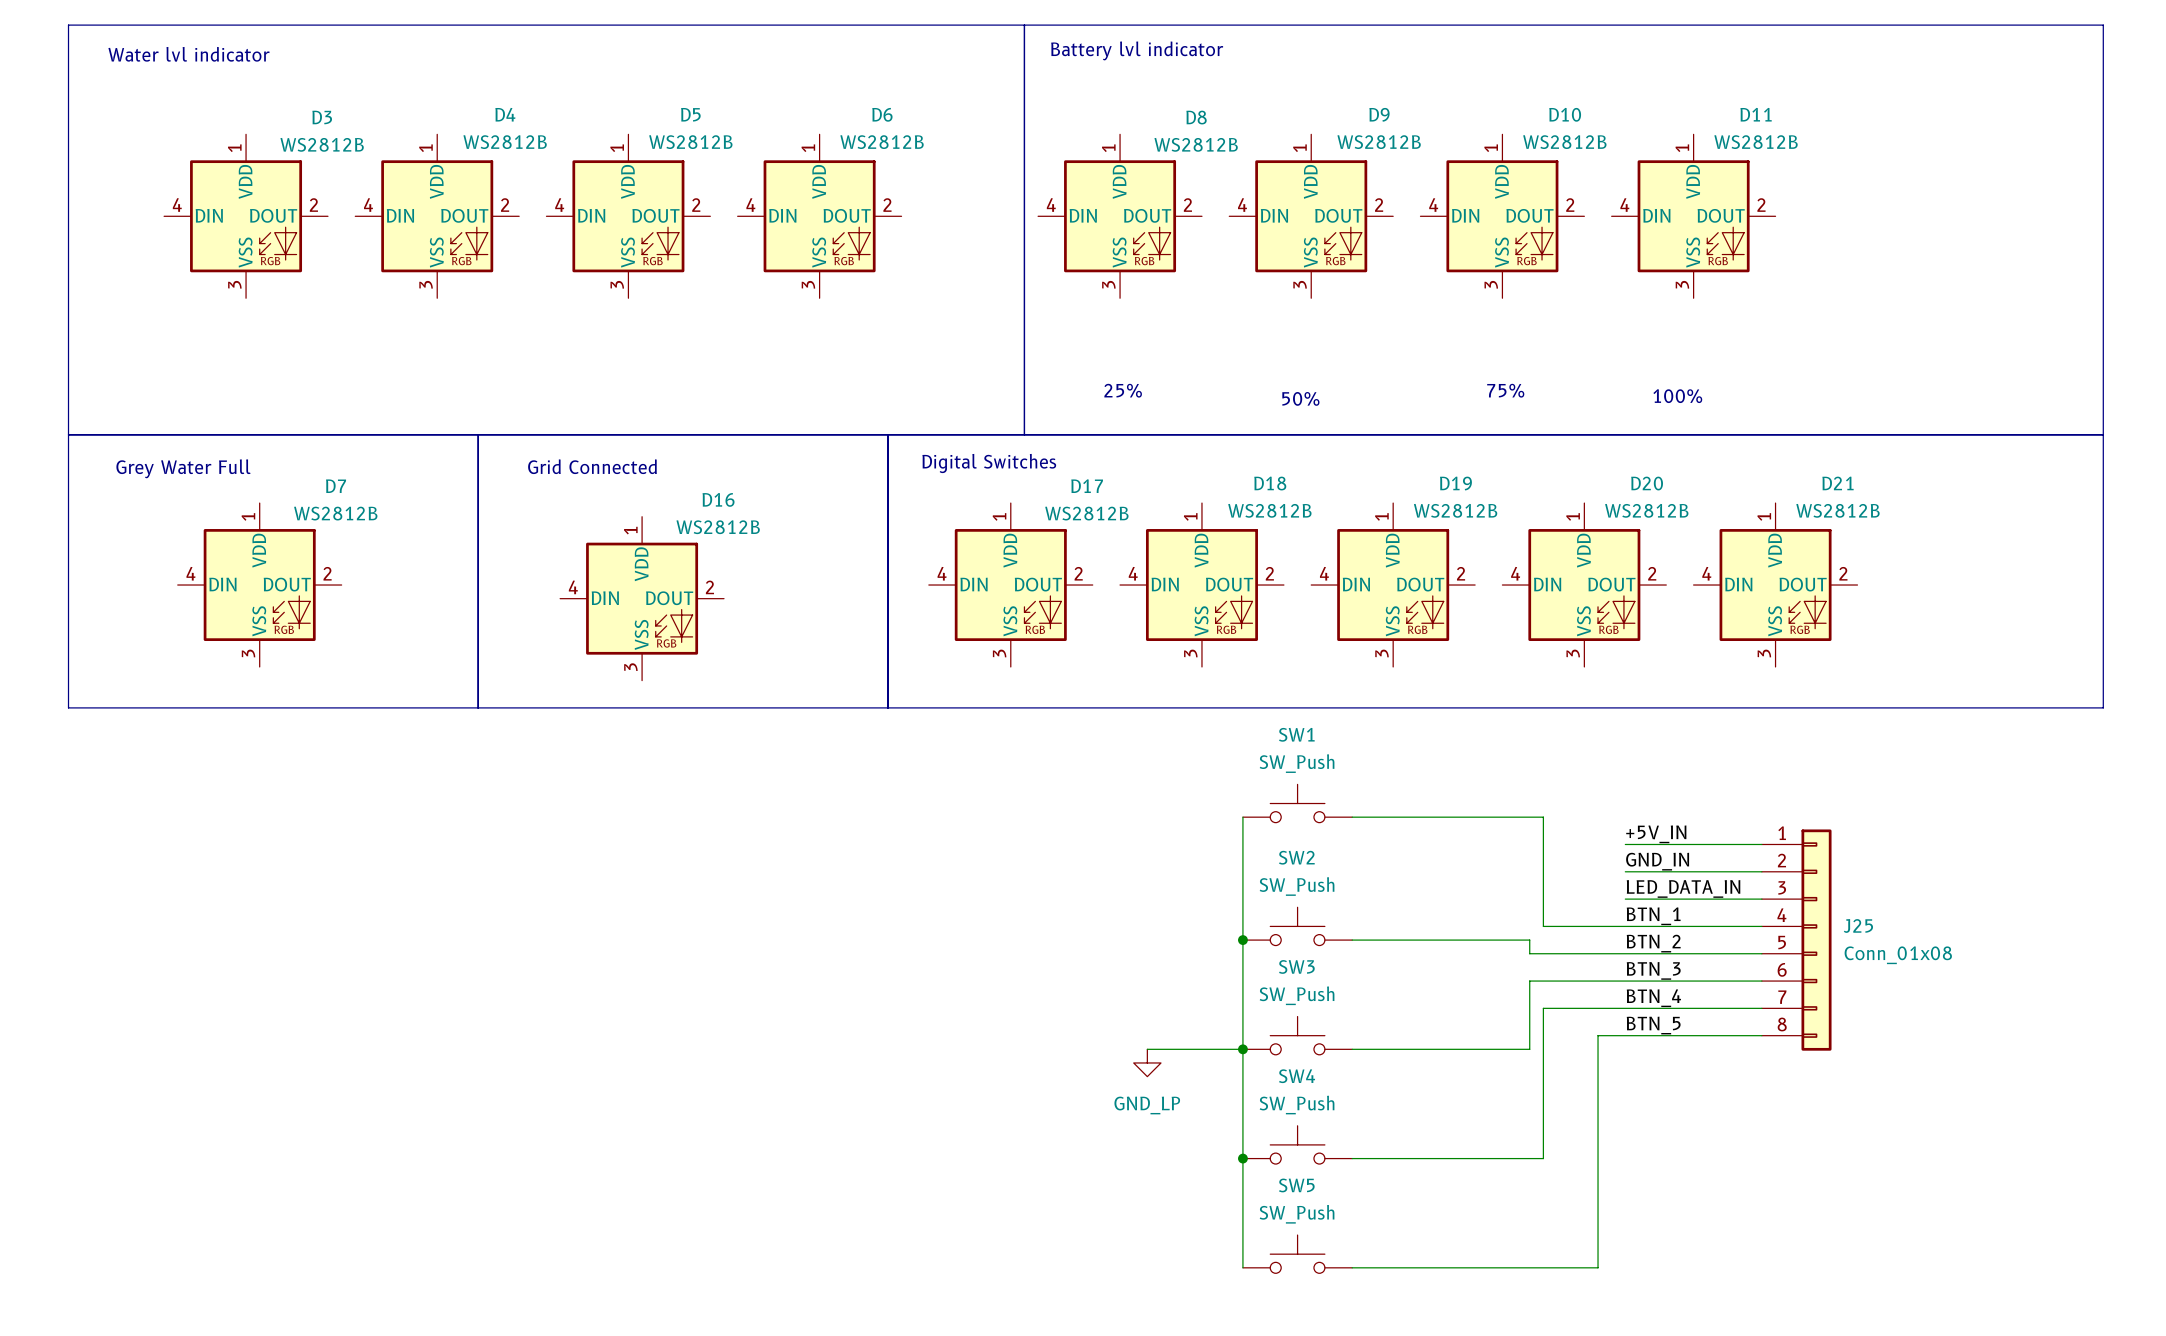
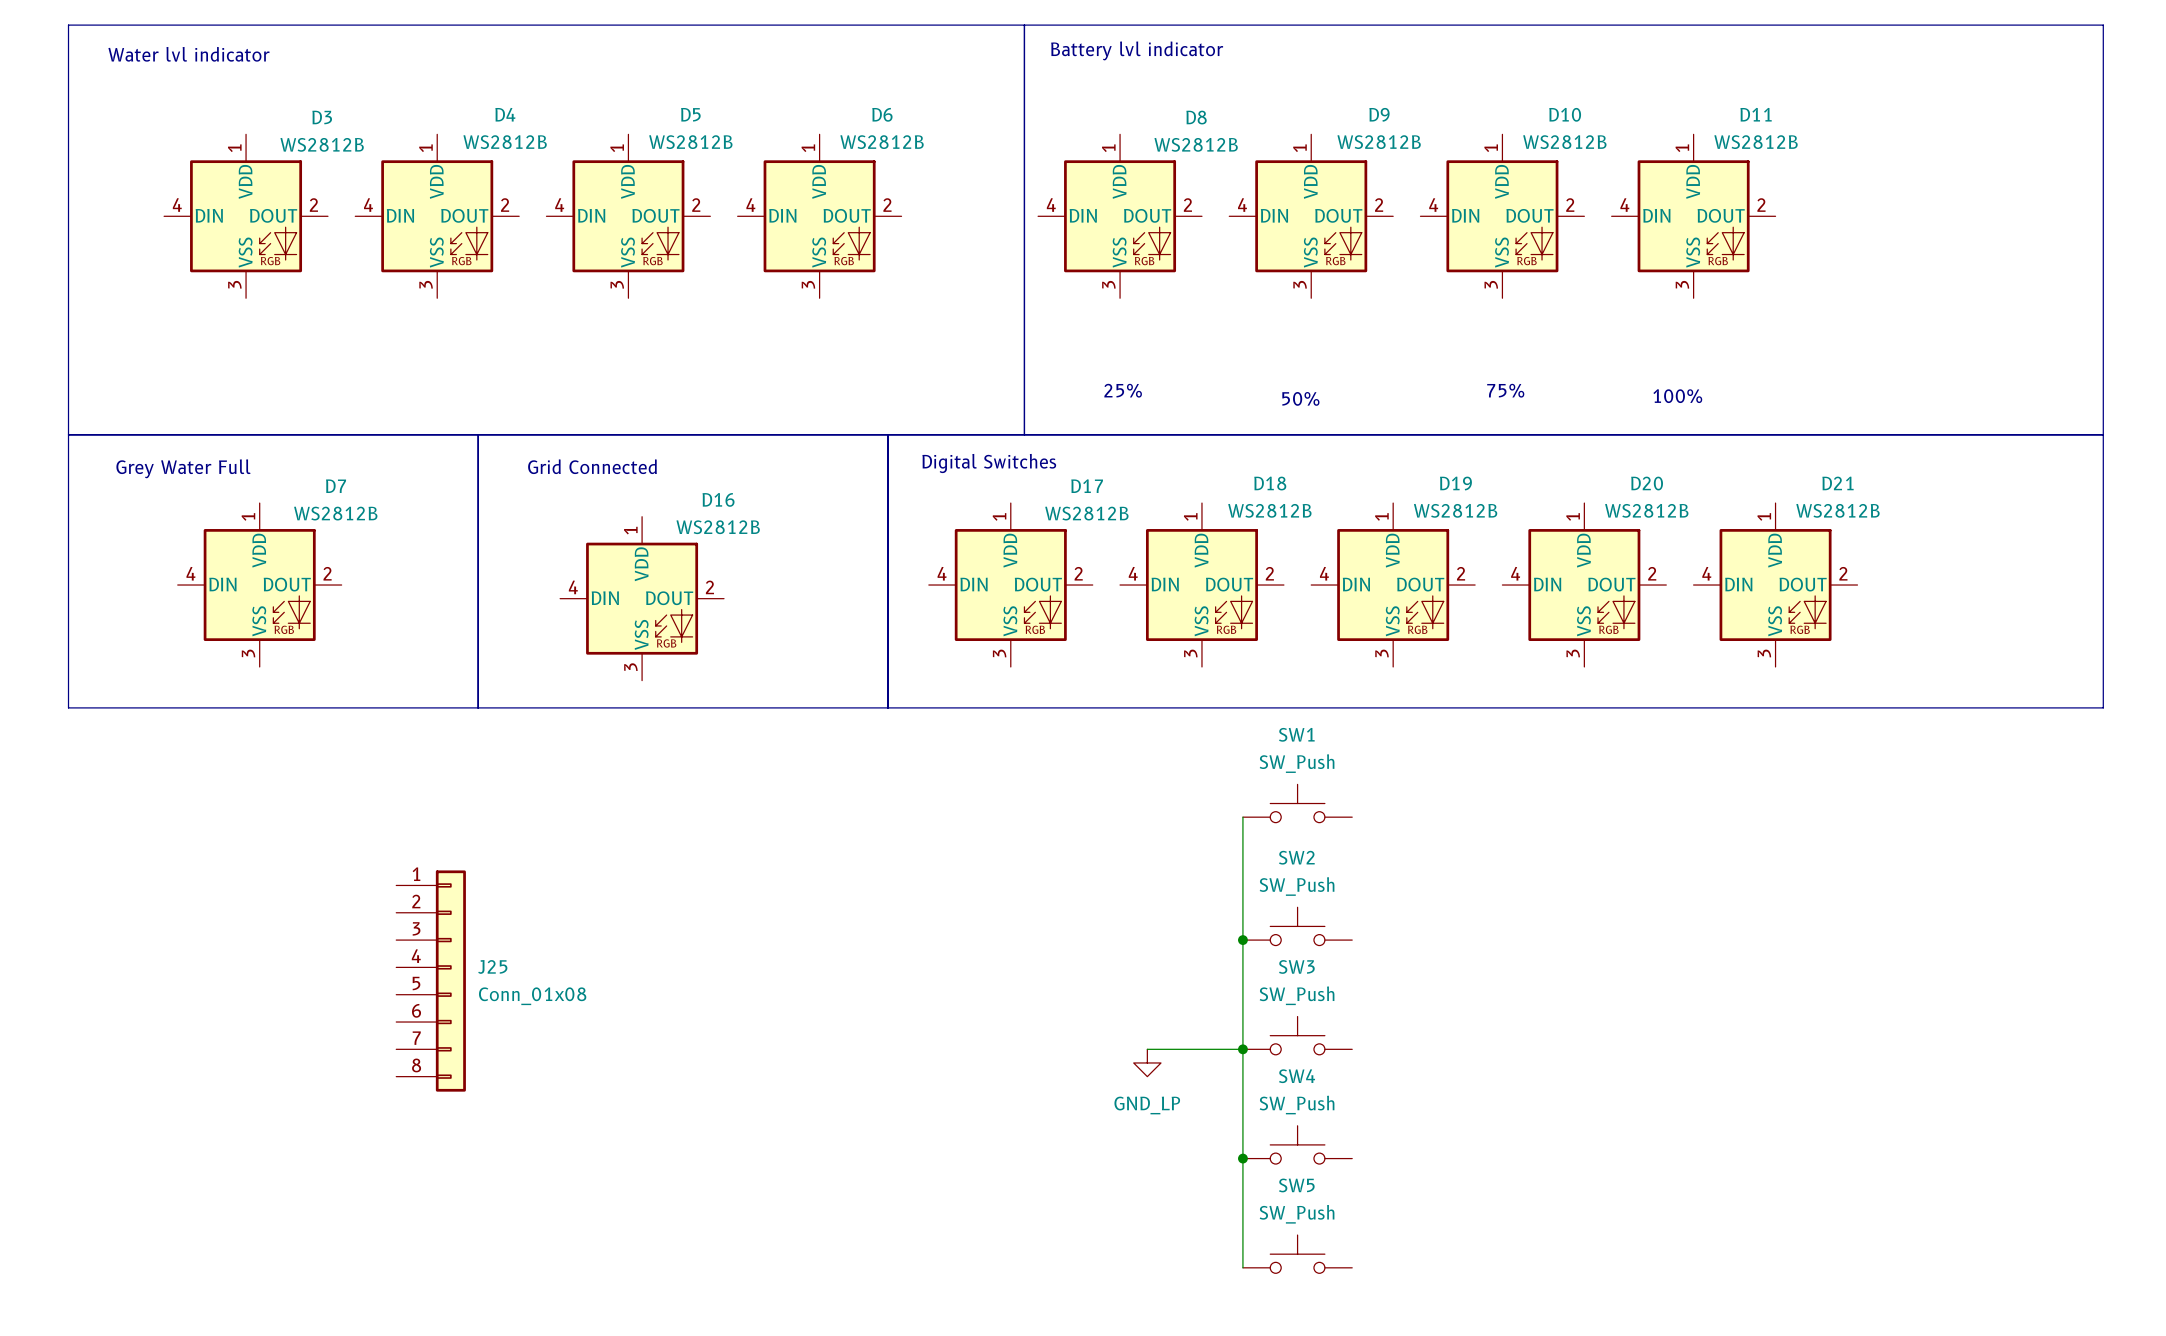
wire: (1352, 817) (1543, 817) (1543, 926) (1761, 926) -> none
label: +5V_IN (1656, 834) -> none
wire: (1625, 844) (1761, 844) -> none
label: GND_IN (1657, 861) -> none
wire: (1625, 871) (1761, 871) -> none
label: LED_DATA_IN (1683, 888) -> none
wire: (1625, 899) (1761, 899) -> none
label: BTN_1 (1653, 916) -> none
wire: (1352, 940) (1529, 940) (1529, 953) (1761, 953) -> none
J25 position: (1796, 940) -> (431, 981)
label: BTN_2 (1653, 943) -> none
label: BTN_3 (1653, 970) -> none
wire: (1761, 981) (1529, 981) (1529, 1049) (1352, 1049) -> none
label: BTN_4 (1653, 998) -> none
wire: (1761, 1008) (1543, 1008) (1543, 1158) (1352, 1158) -> none
label: BTN_5 (1653, 1025) -> none
wire: (1761, 1035) (1598, 1035) (1598, 1267) (1352, 1267) -> none

